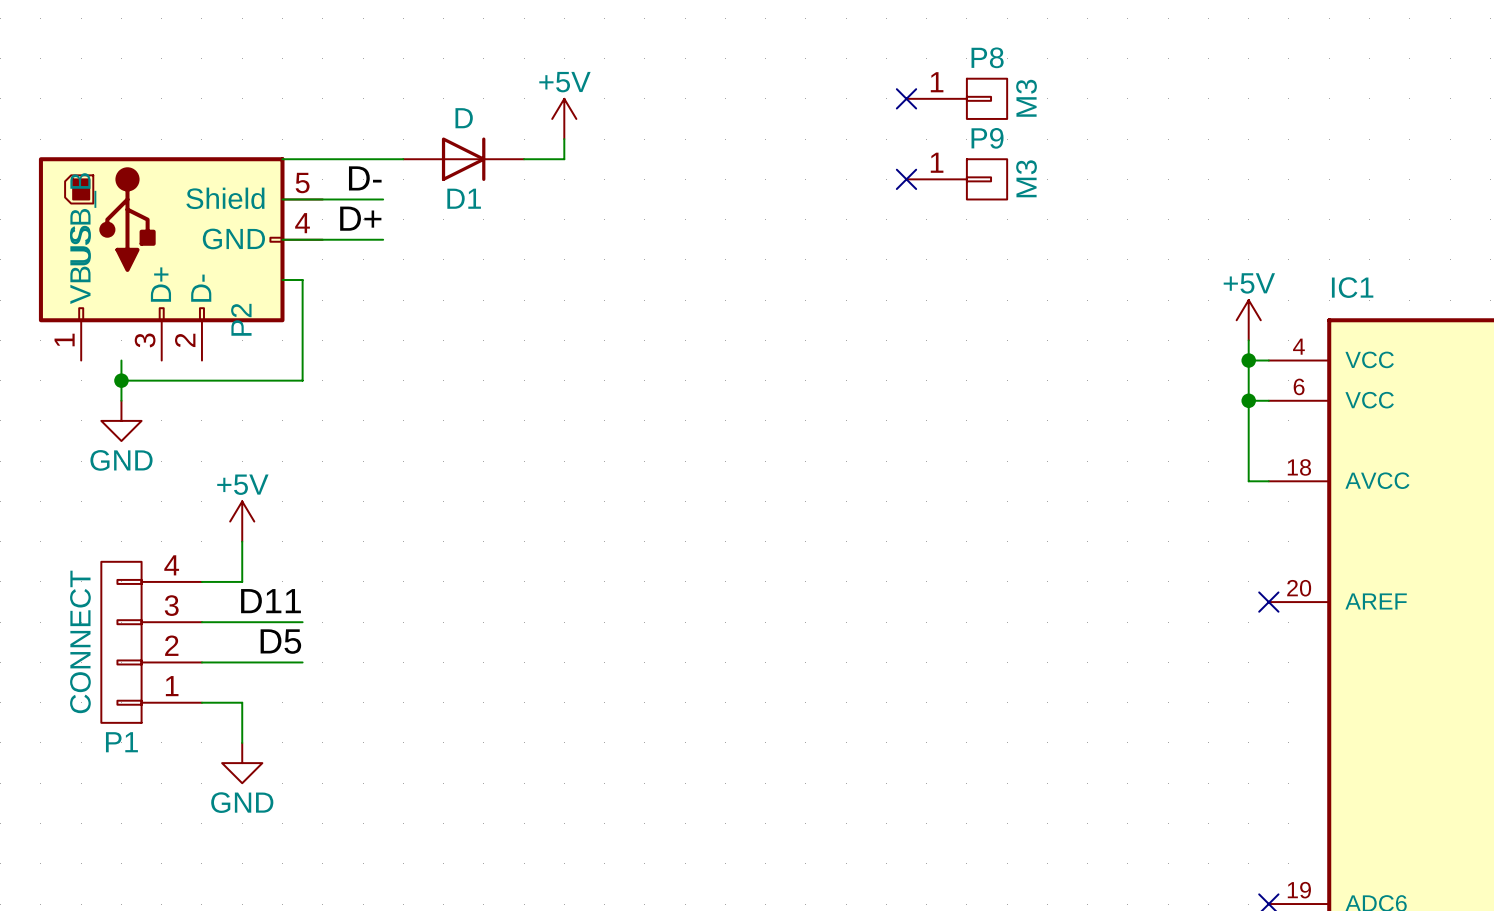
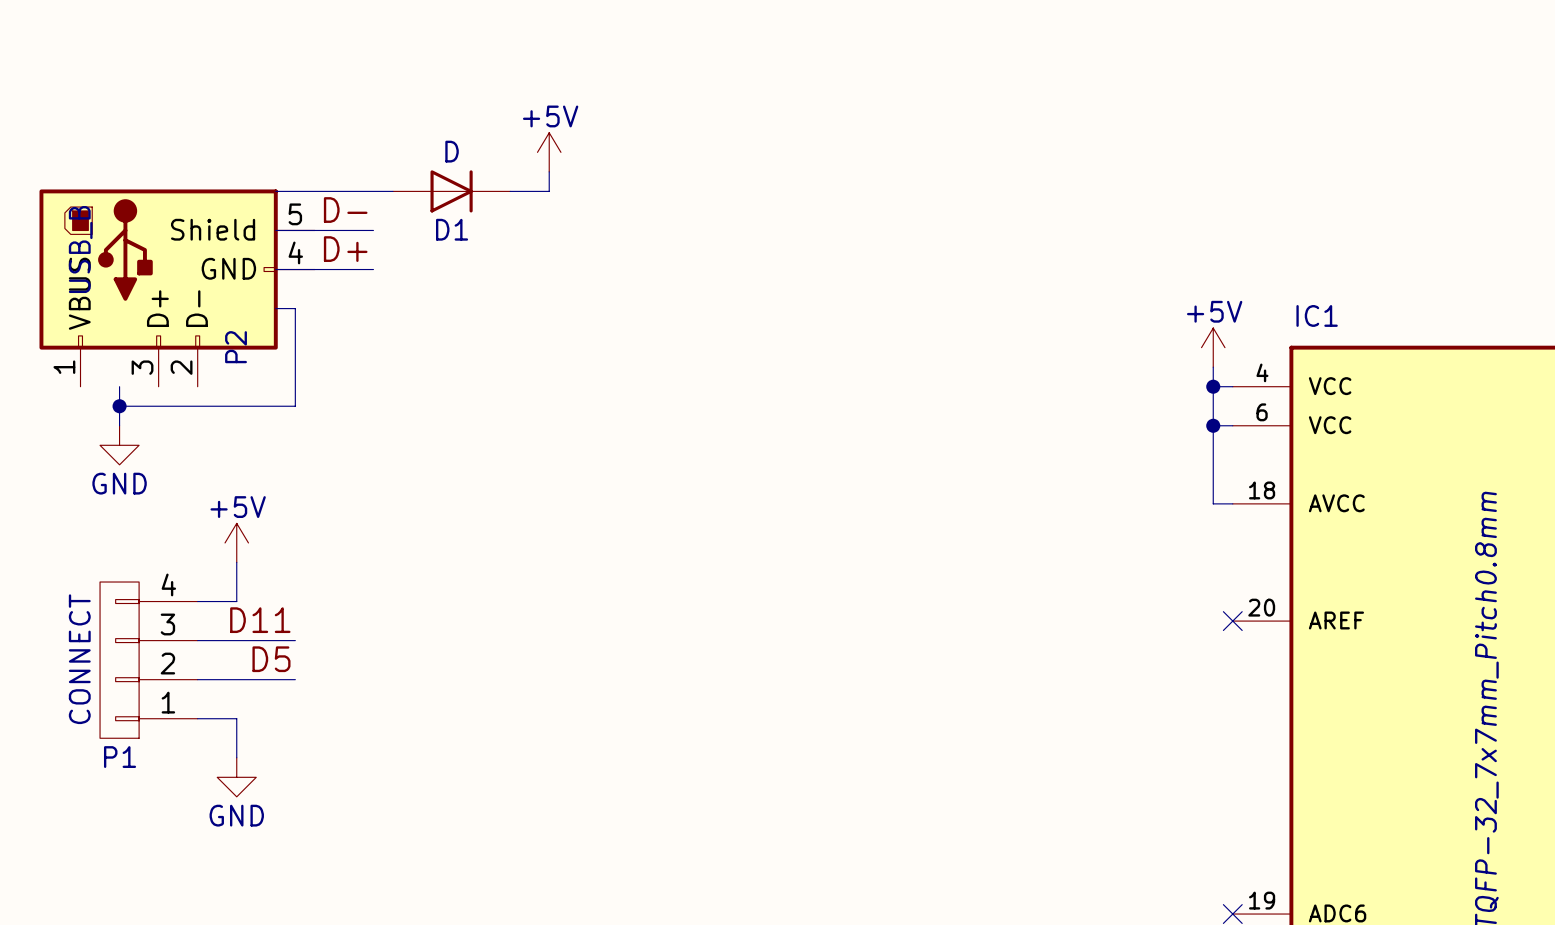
no-connect mark: (906, 98) -> none
P8: M3 (956, 98) -> none
no-connect mark: (906, 179) -> none
P9: M3 (956, 179) -> none

